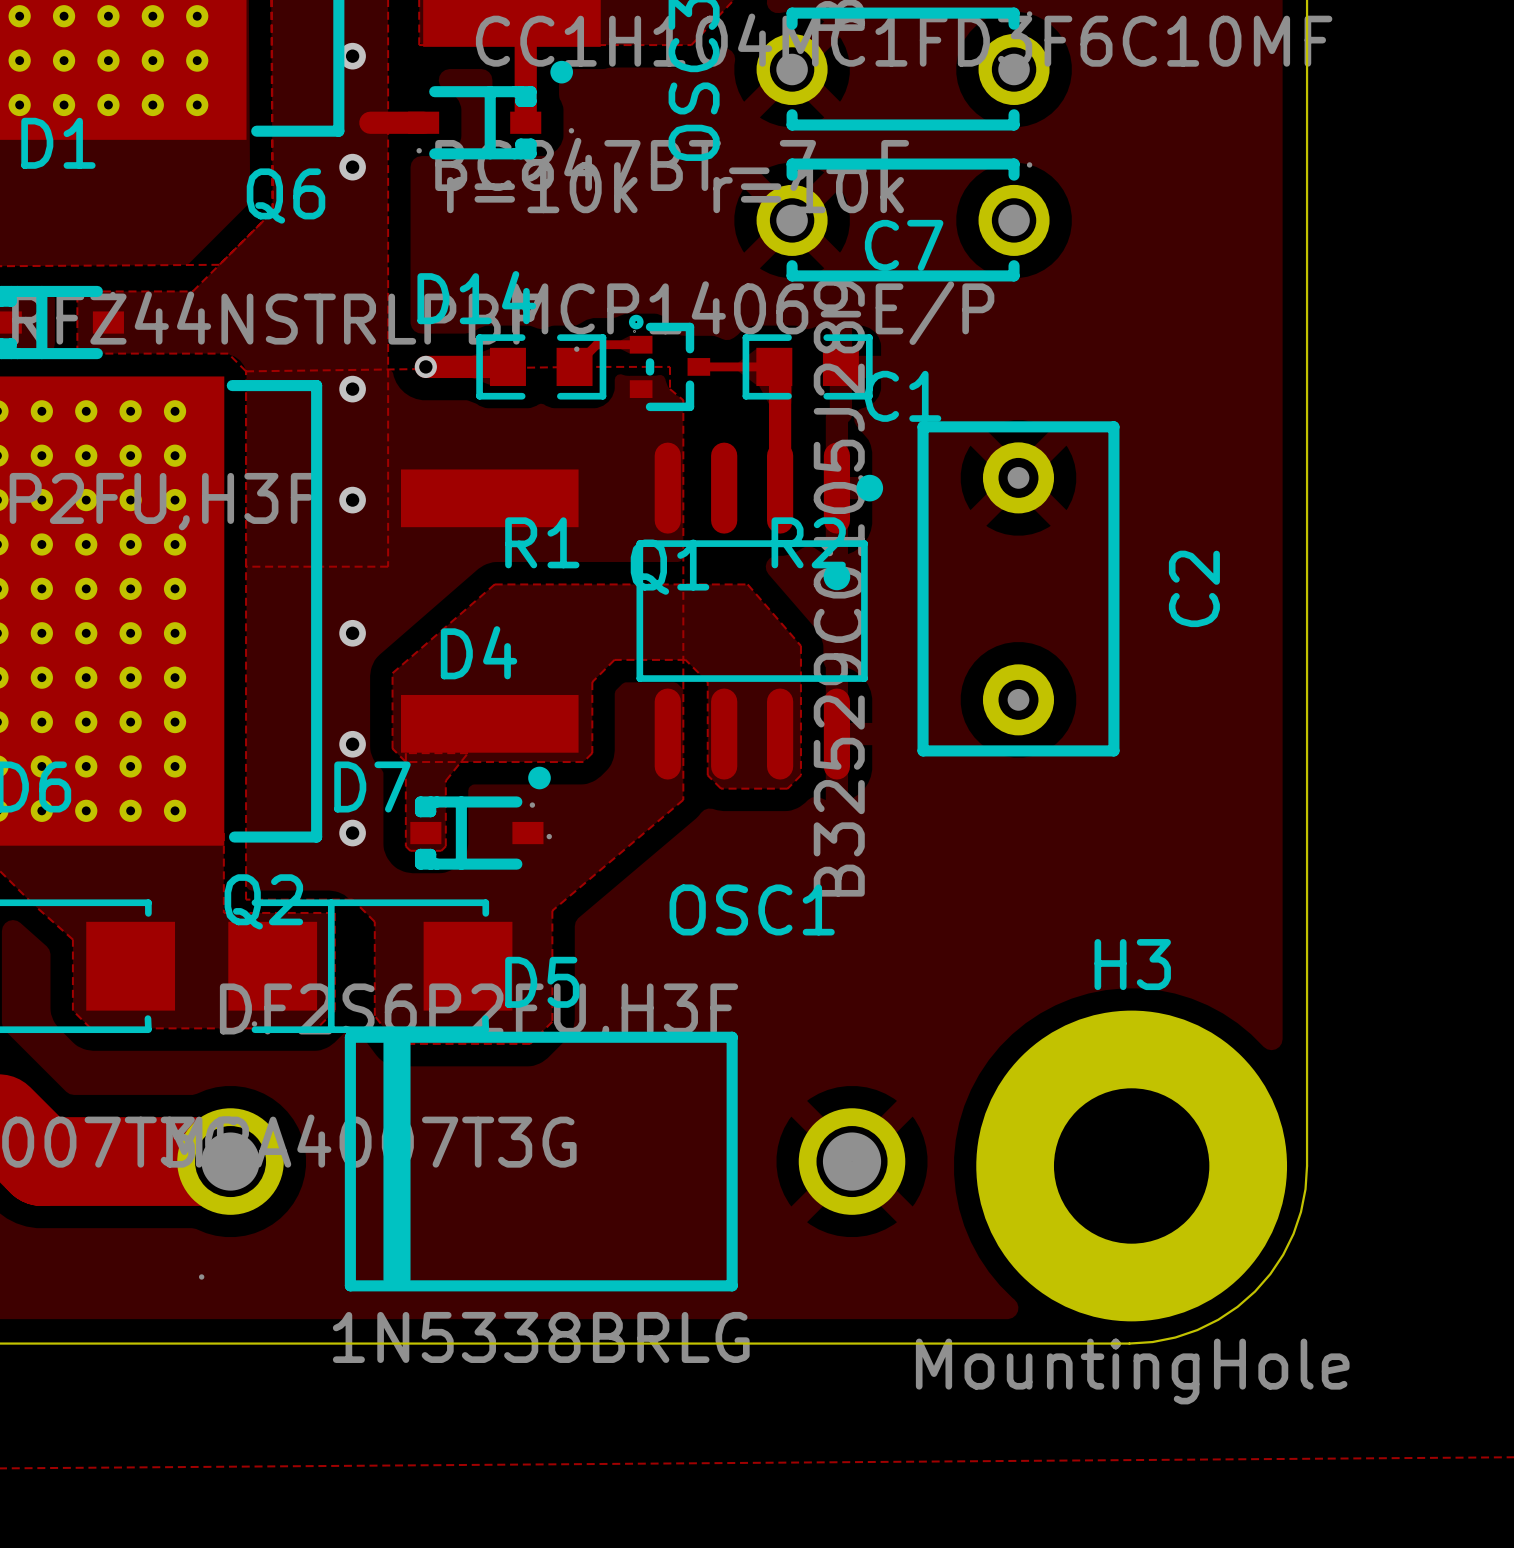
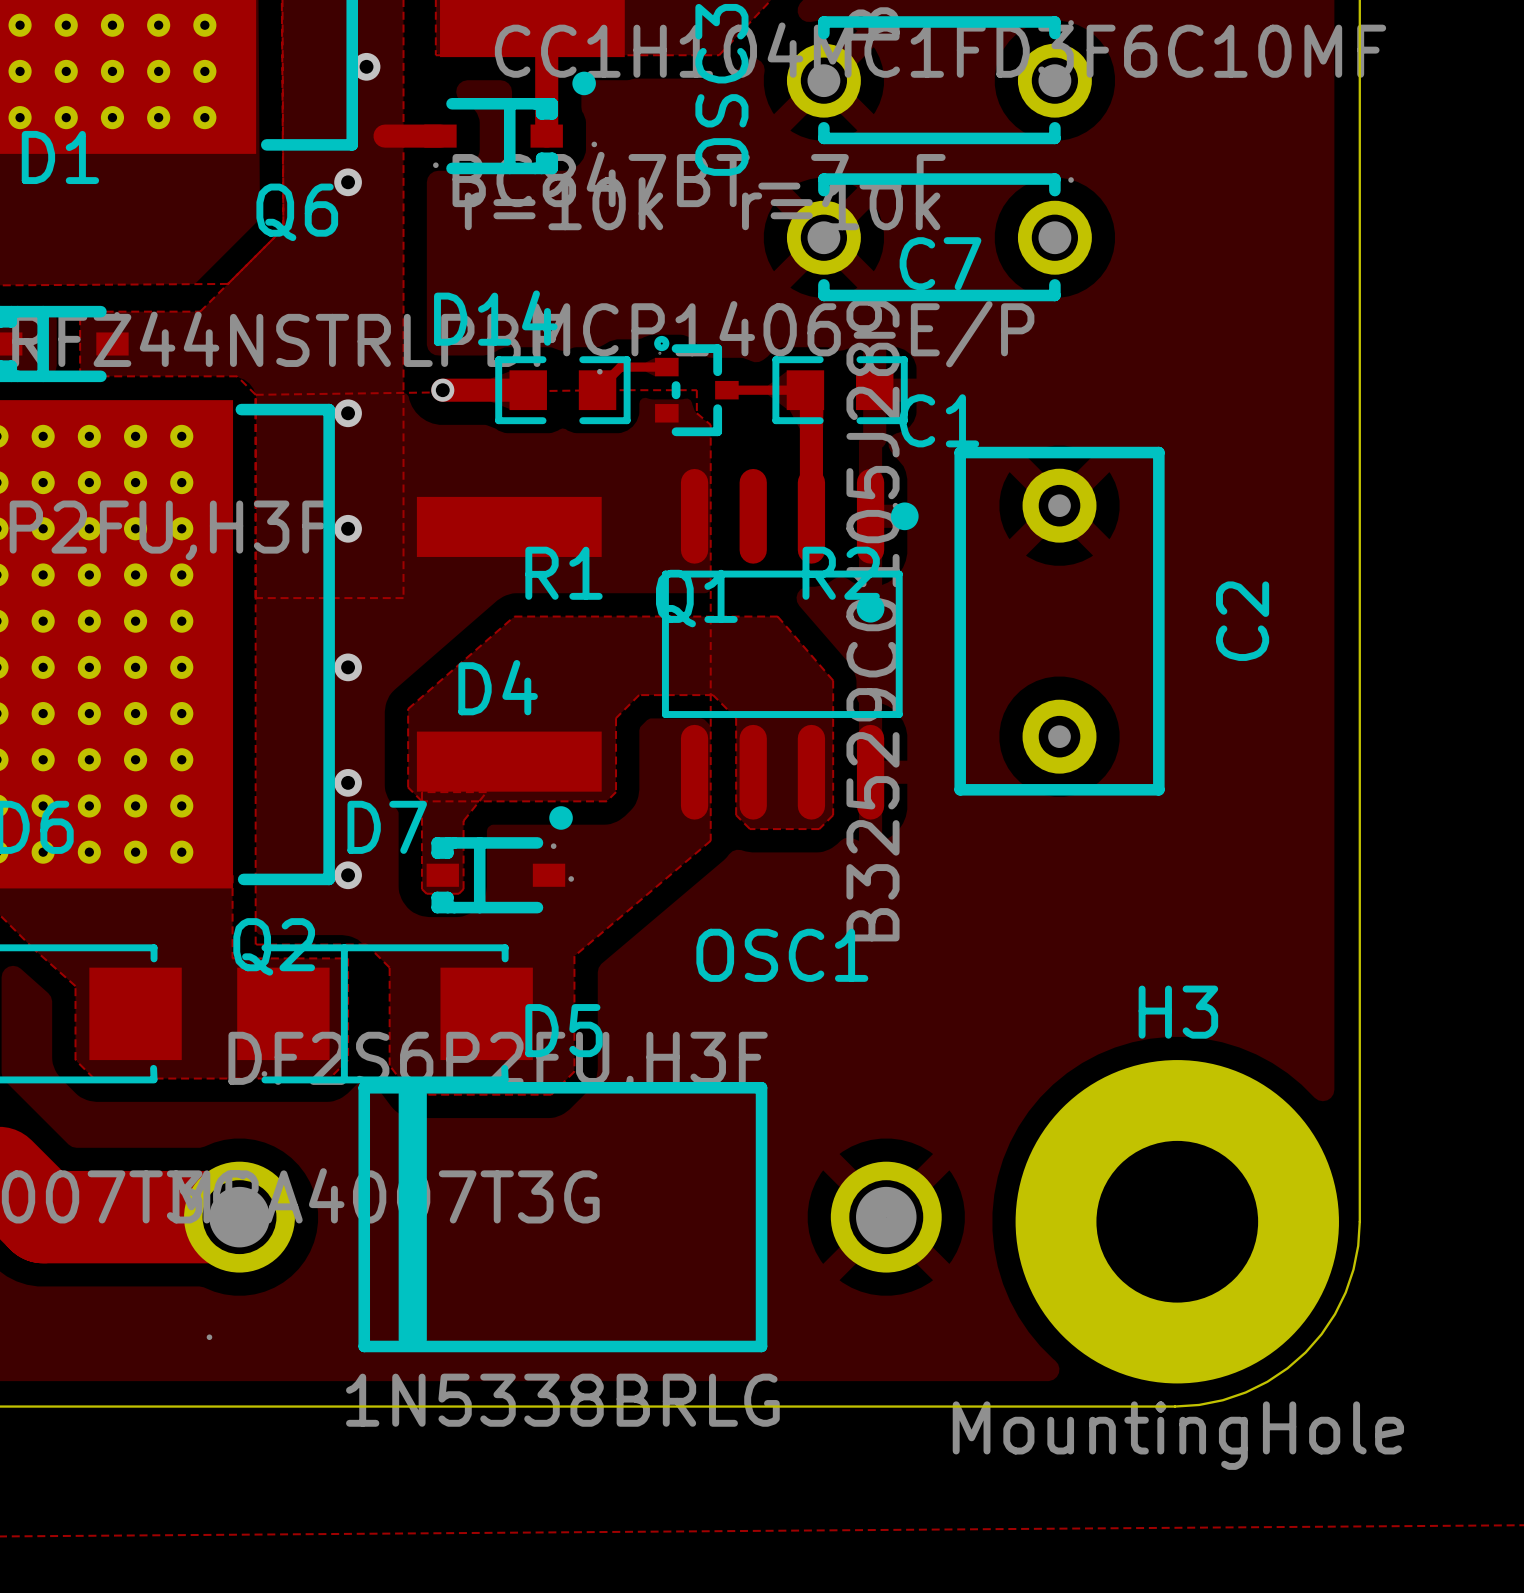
via position: (352, 167) -> (348, 182)
via position: (352, 389) -> (348, 413)
via position: (352, 500) -> (348, 528)
via position: (352, 633) -> (348, 667)
via position: (352, 744) -> (348, 782)
via position: (352, 833) -> (348, 875)

